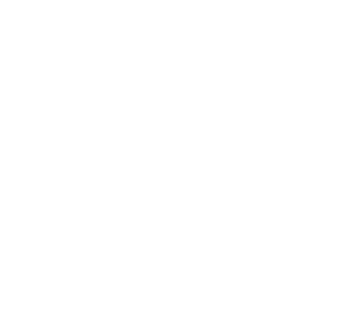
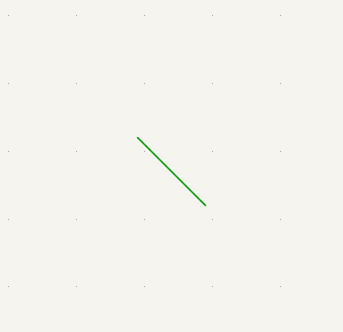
wire: none -> (137, 137) (205, 205)

